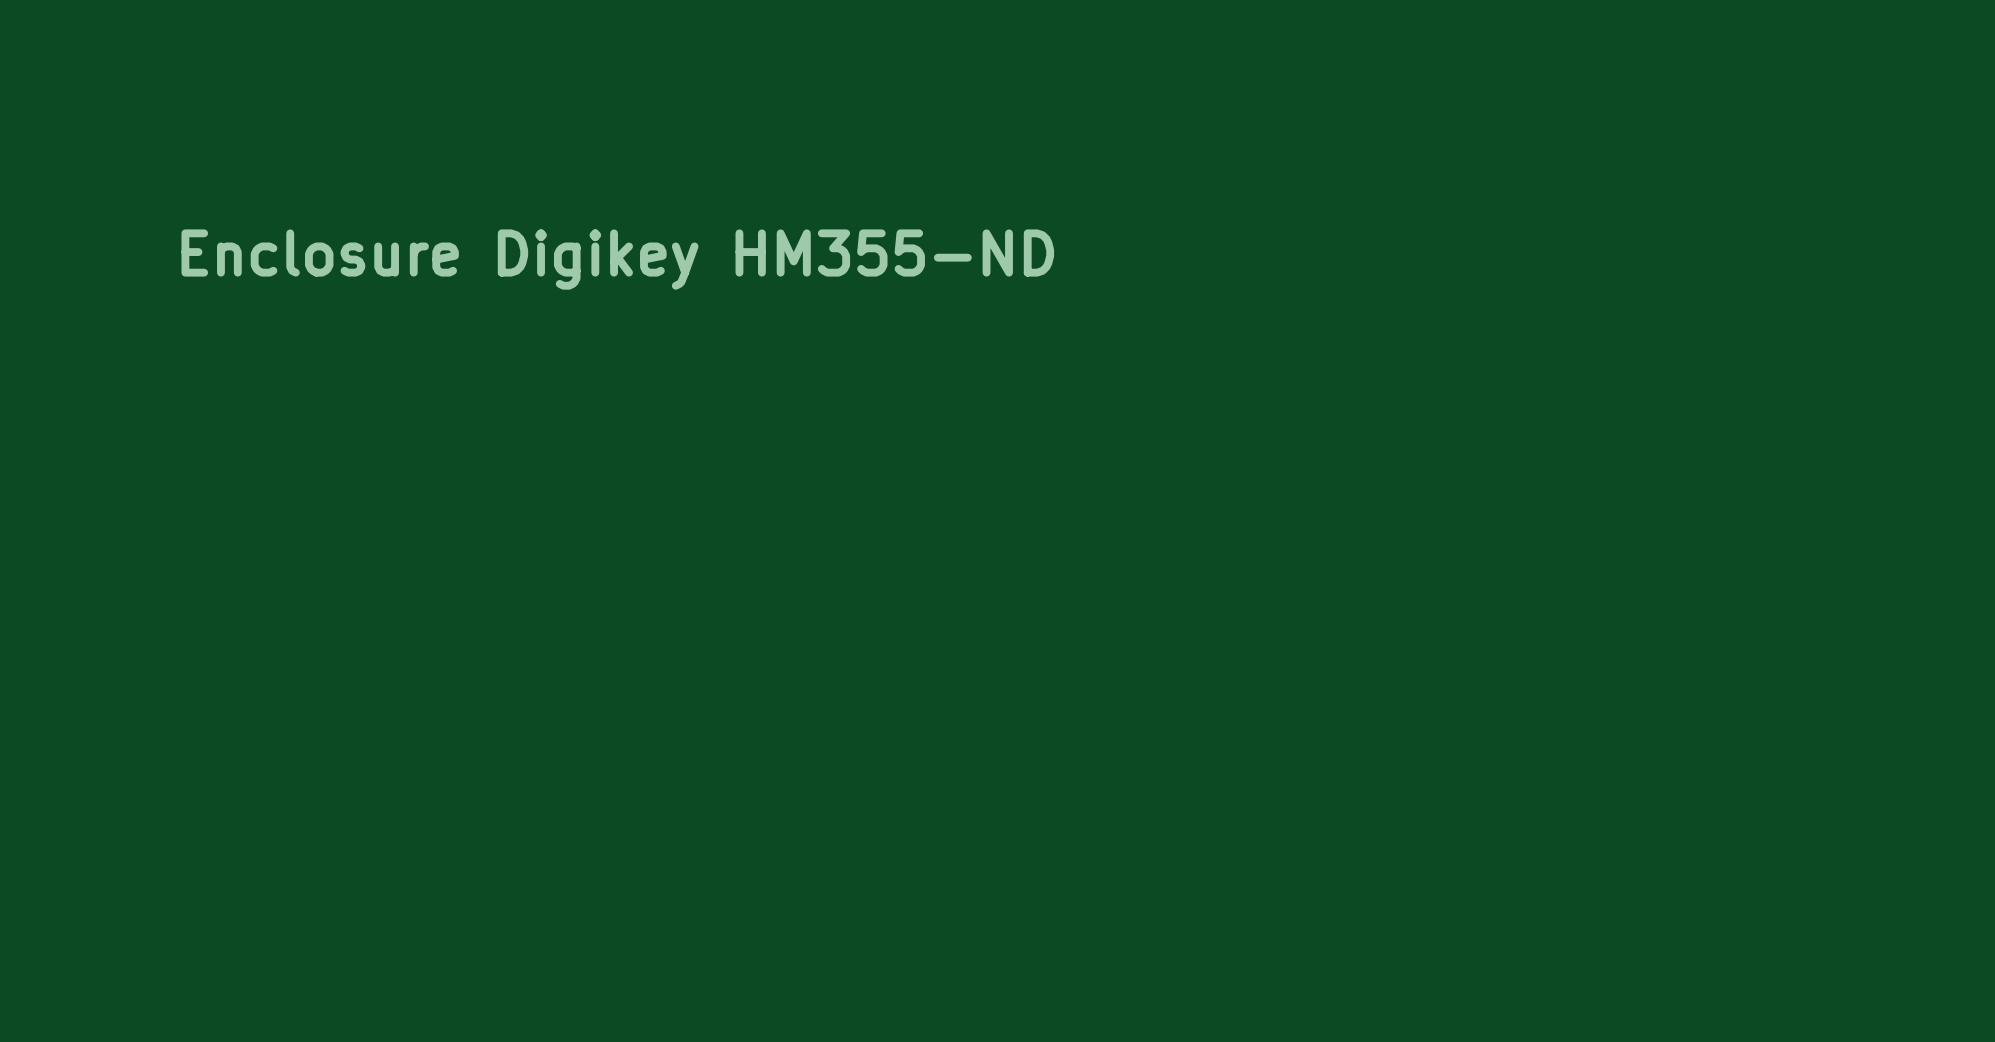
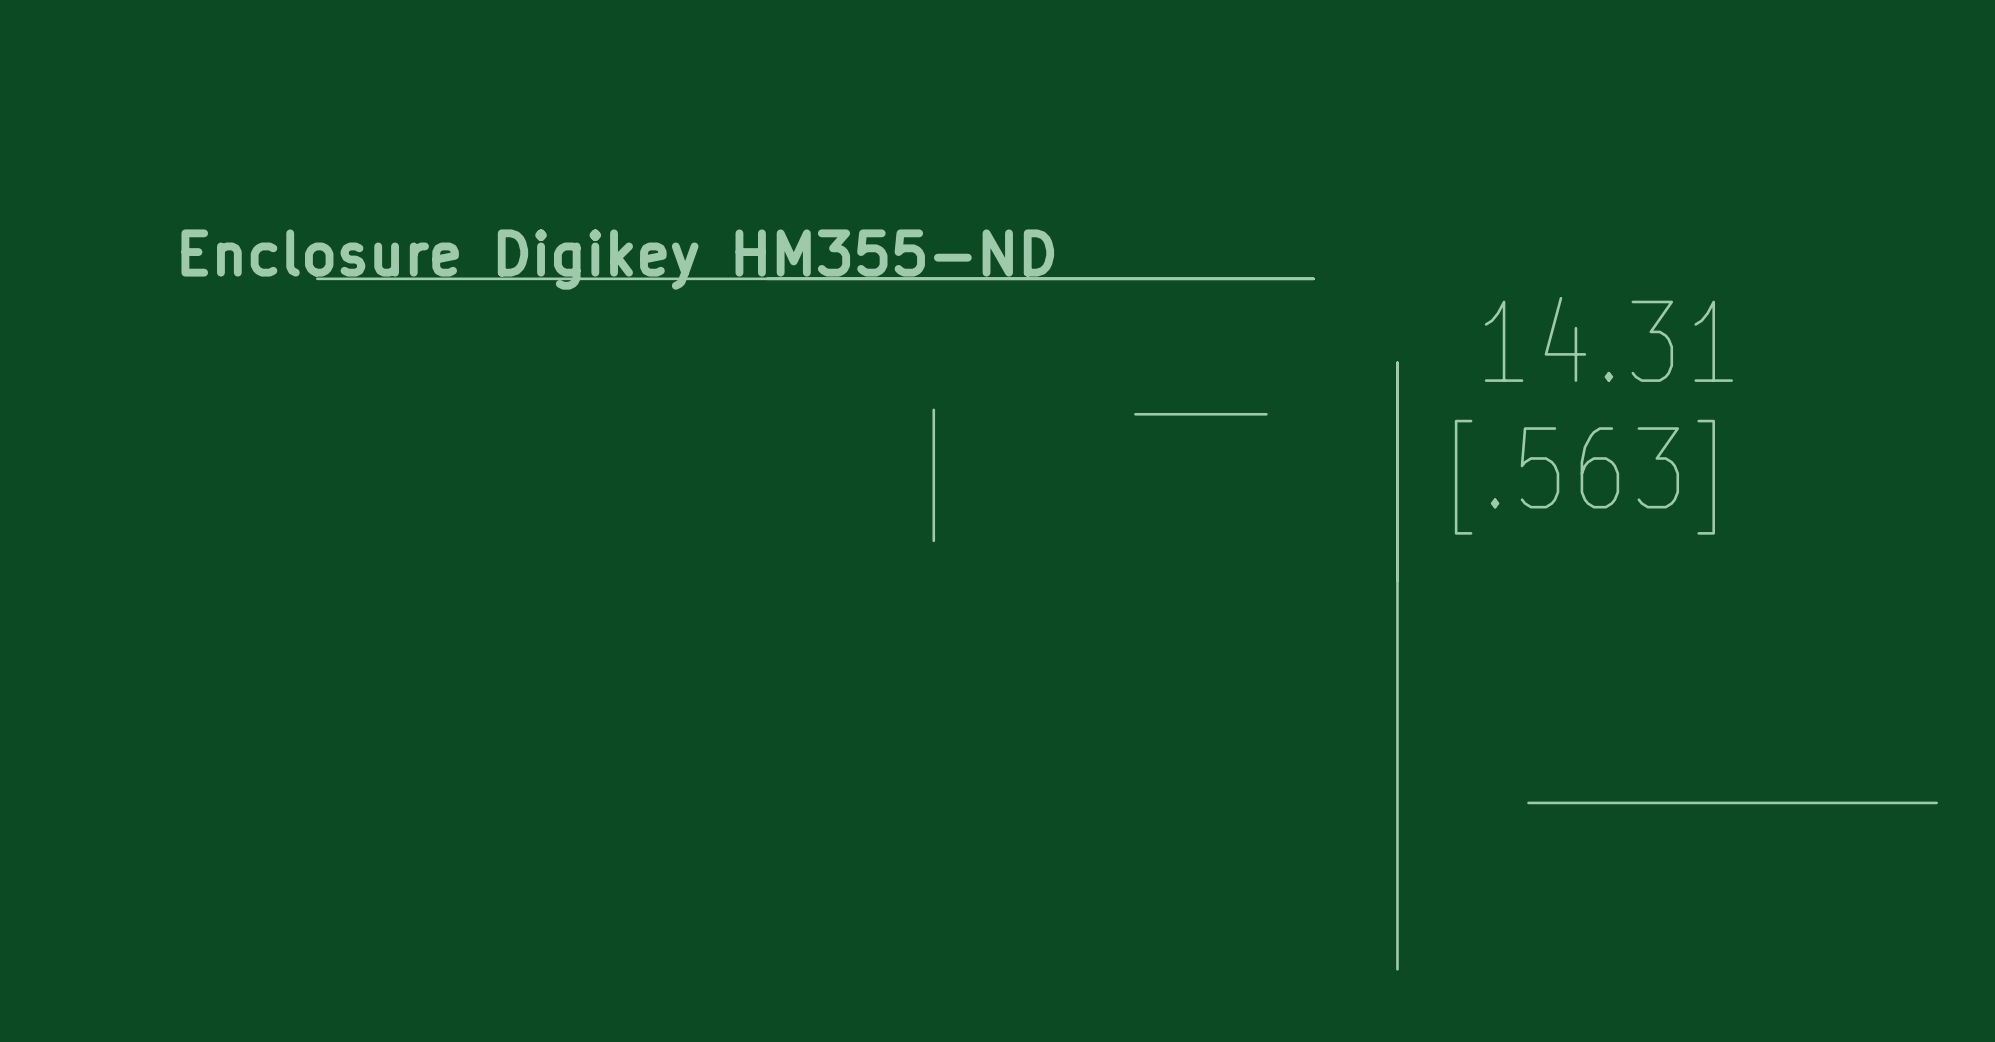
line: none -> (317, 278) (1313, 278)
text: none -> 14.31 (1608, 339)
line: none -> (1397, 362) (1397, 969)
line: none -> (933, 409) (933, 540)
line: none -> (1135, 414) (1266, 414)
text: none -> [.563] (1584, 477)
line: none -> (1528, 802) (1936, 802)

